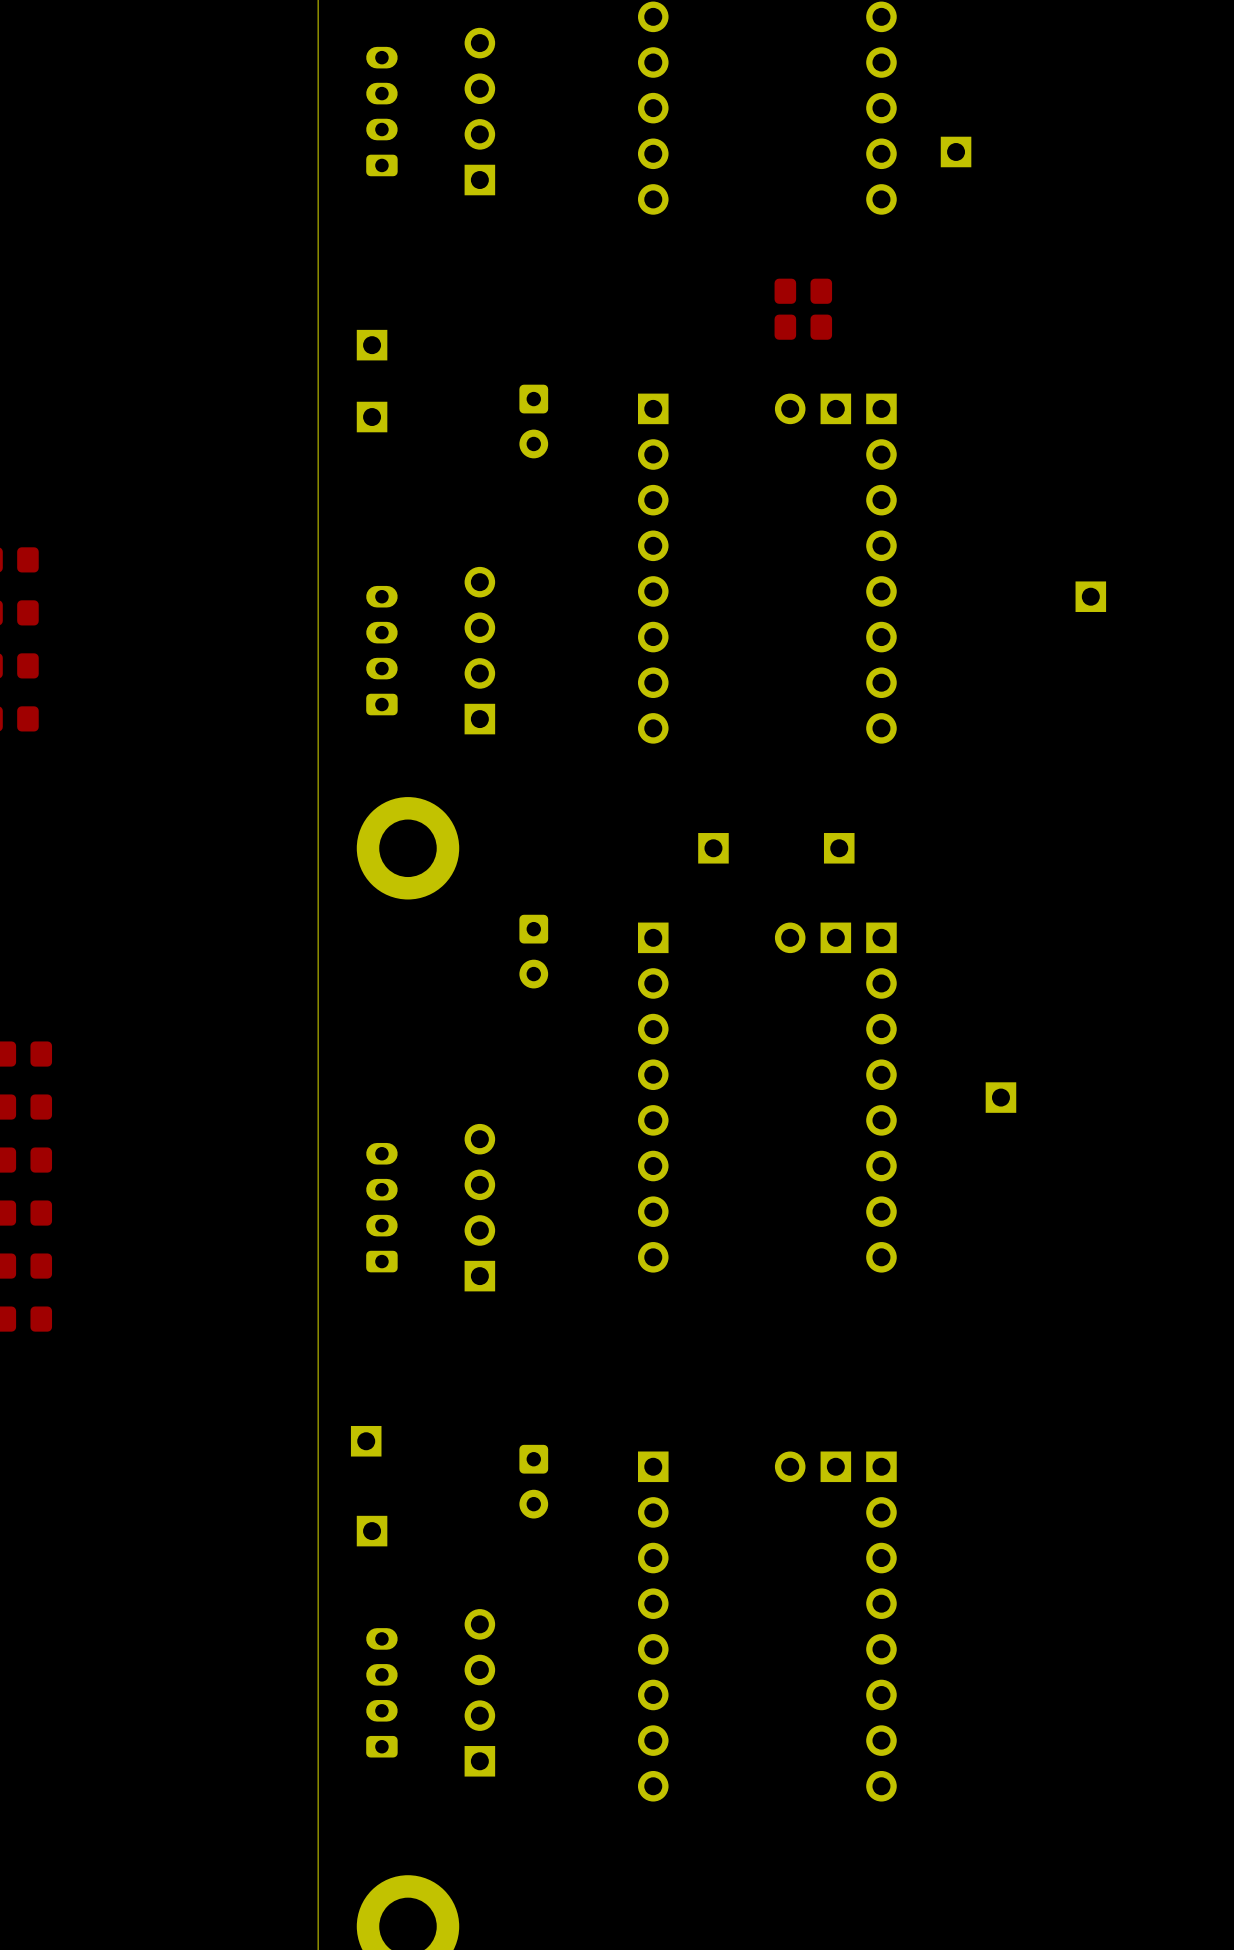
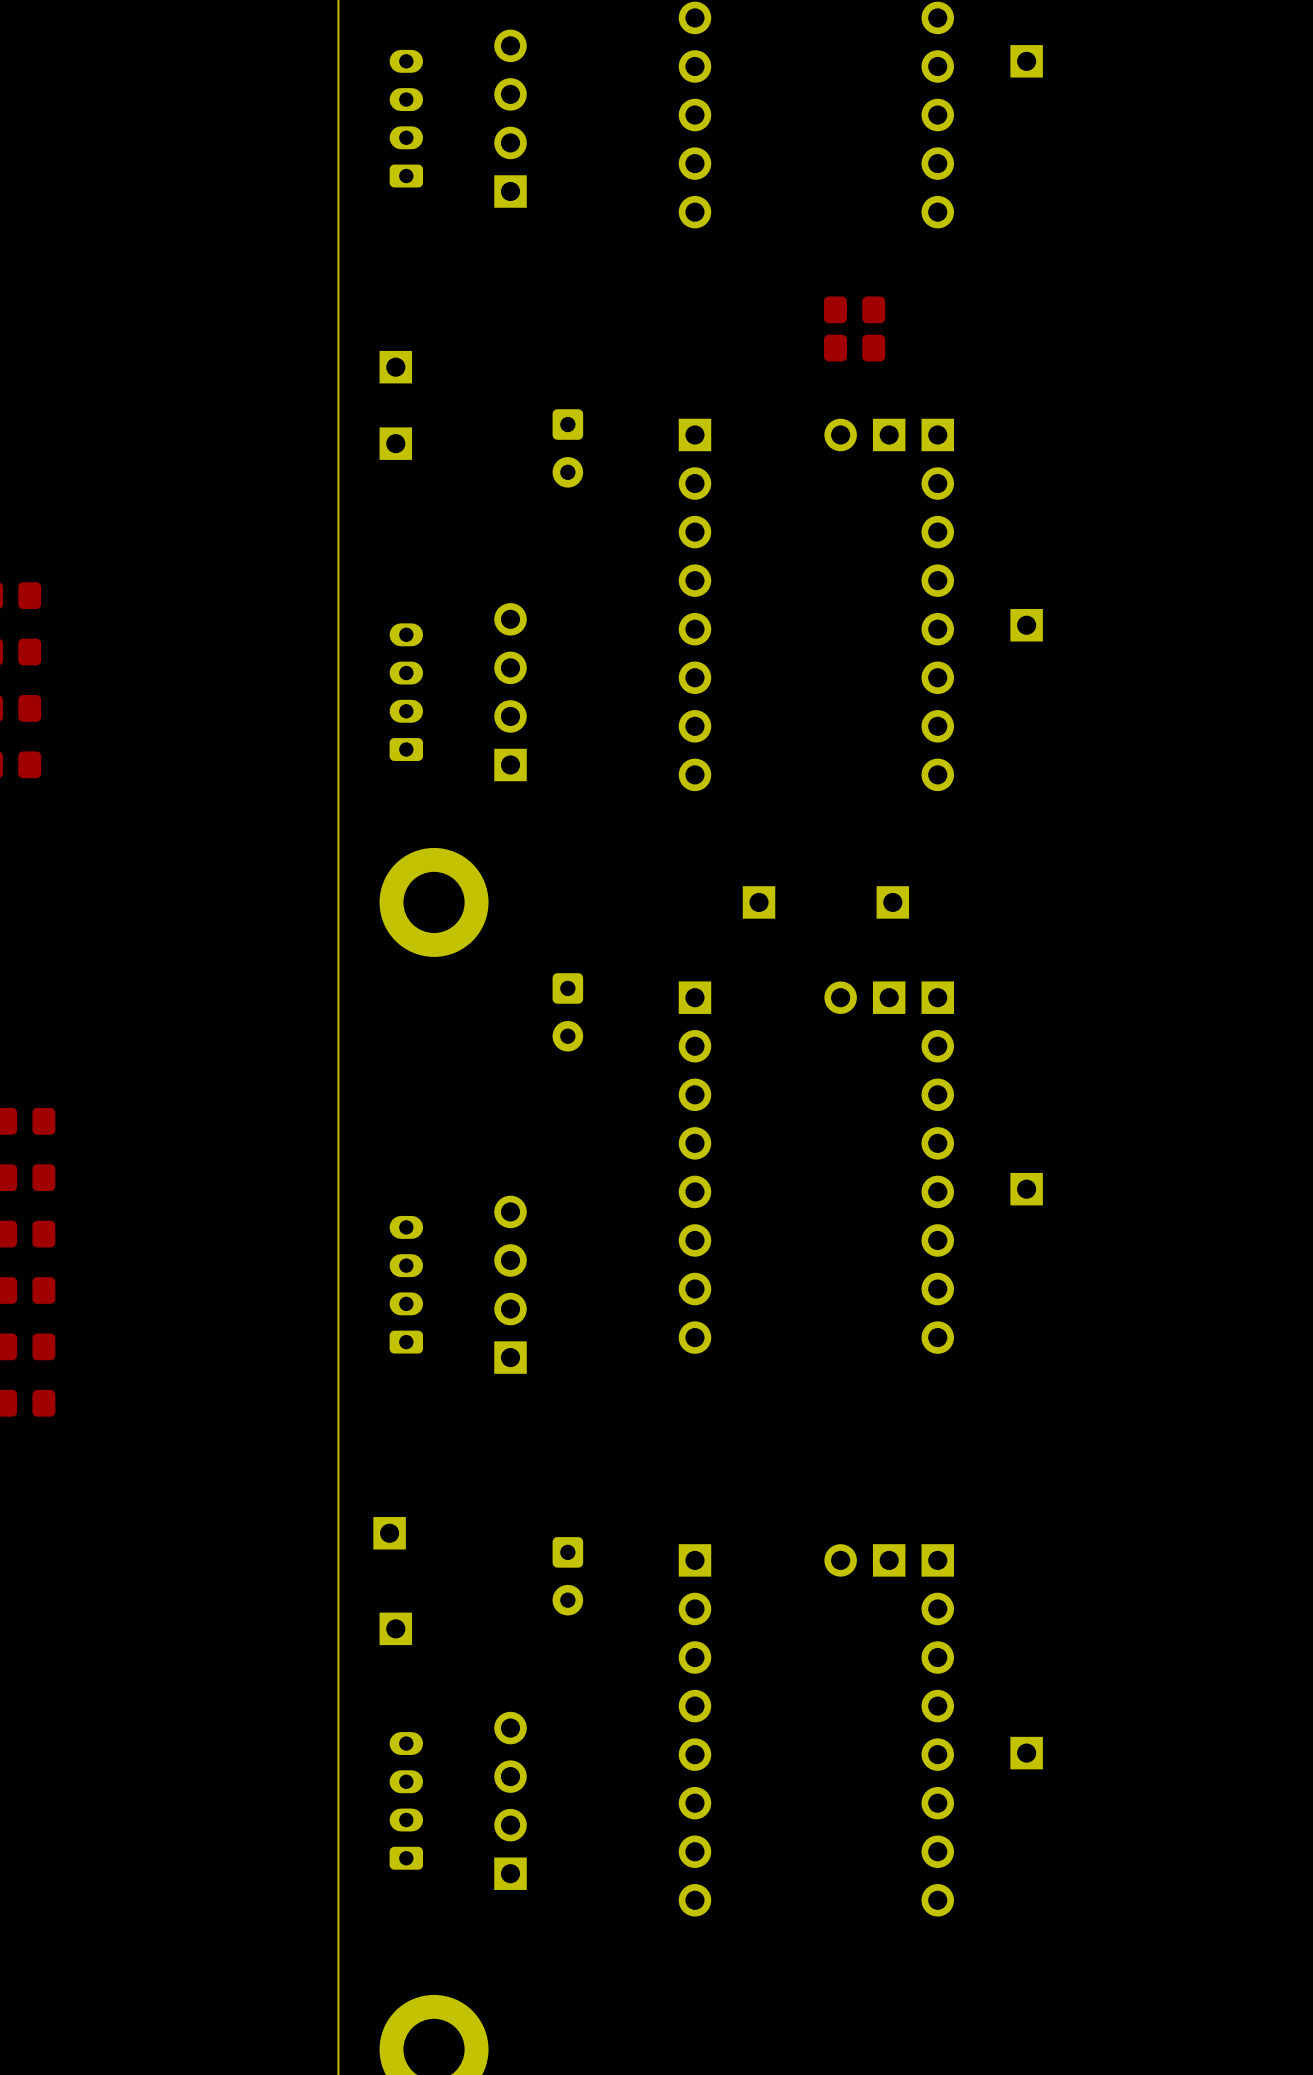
part position: (956, 151) -> (1026, 61)
part position: (1090, 596) -> (1026, 625)
part position: (1000, 1097) -> (1026, 1189)
part: none -> (1026, 1753)

